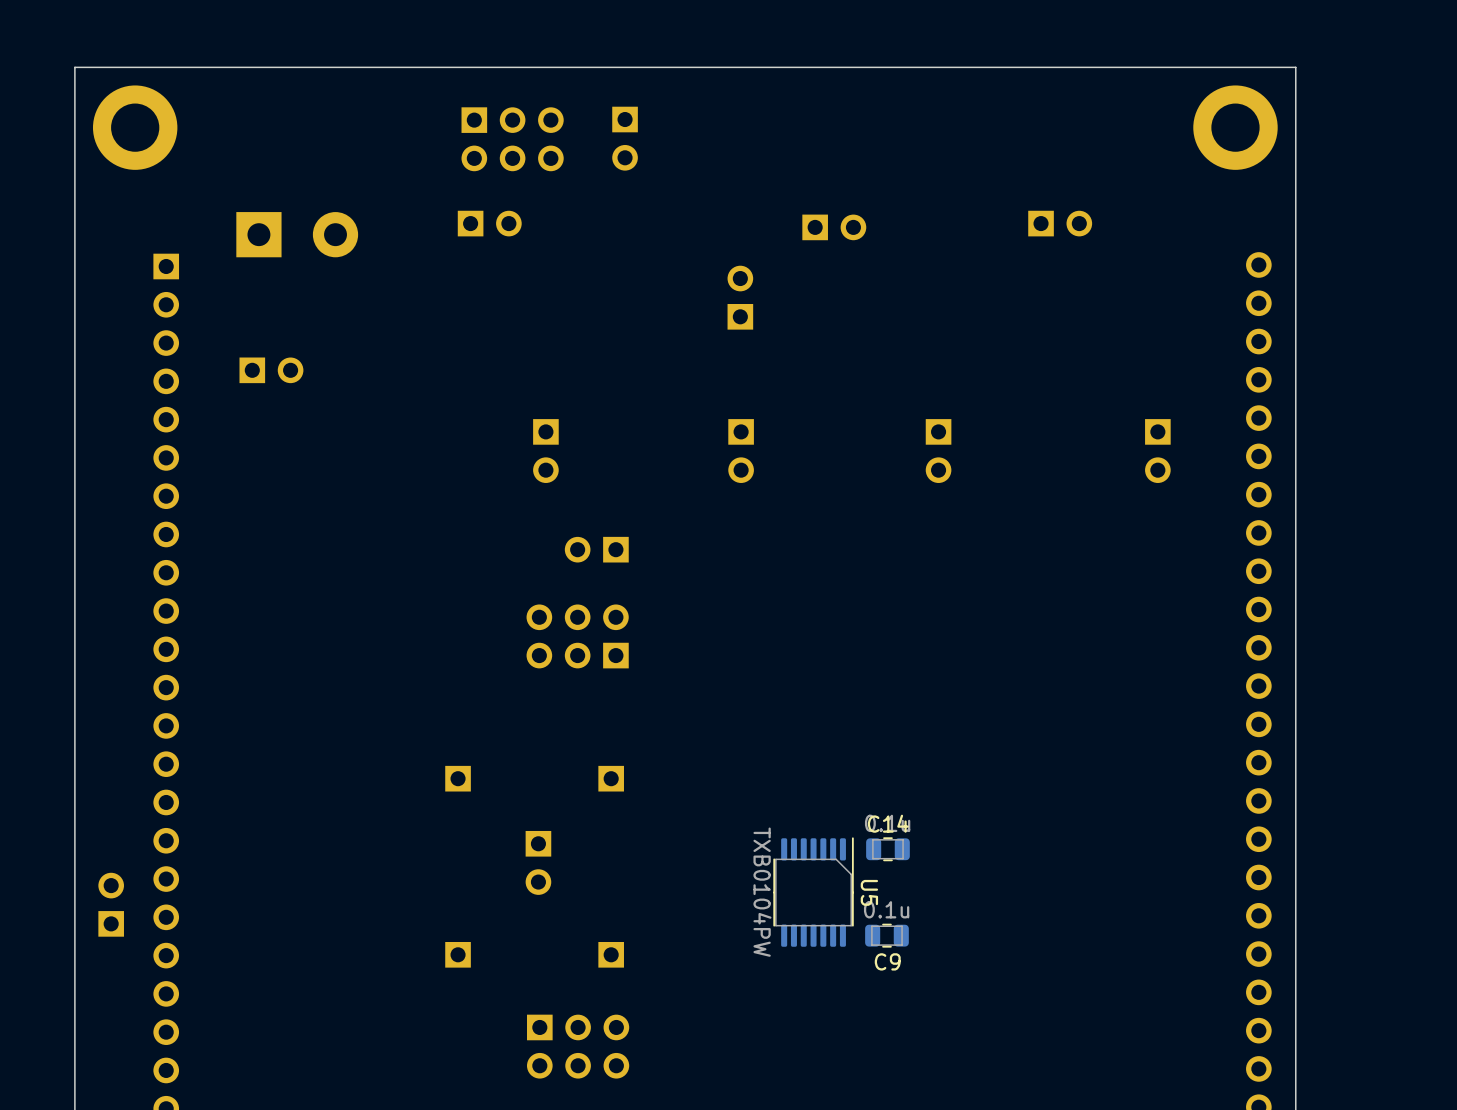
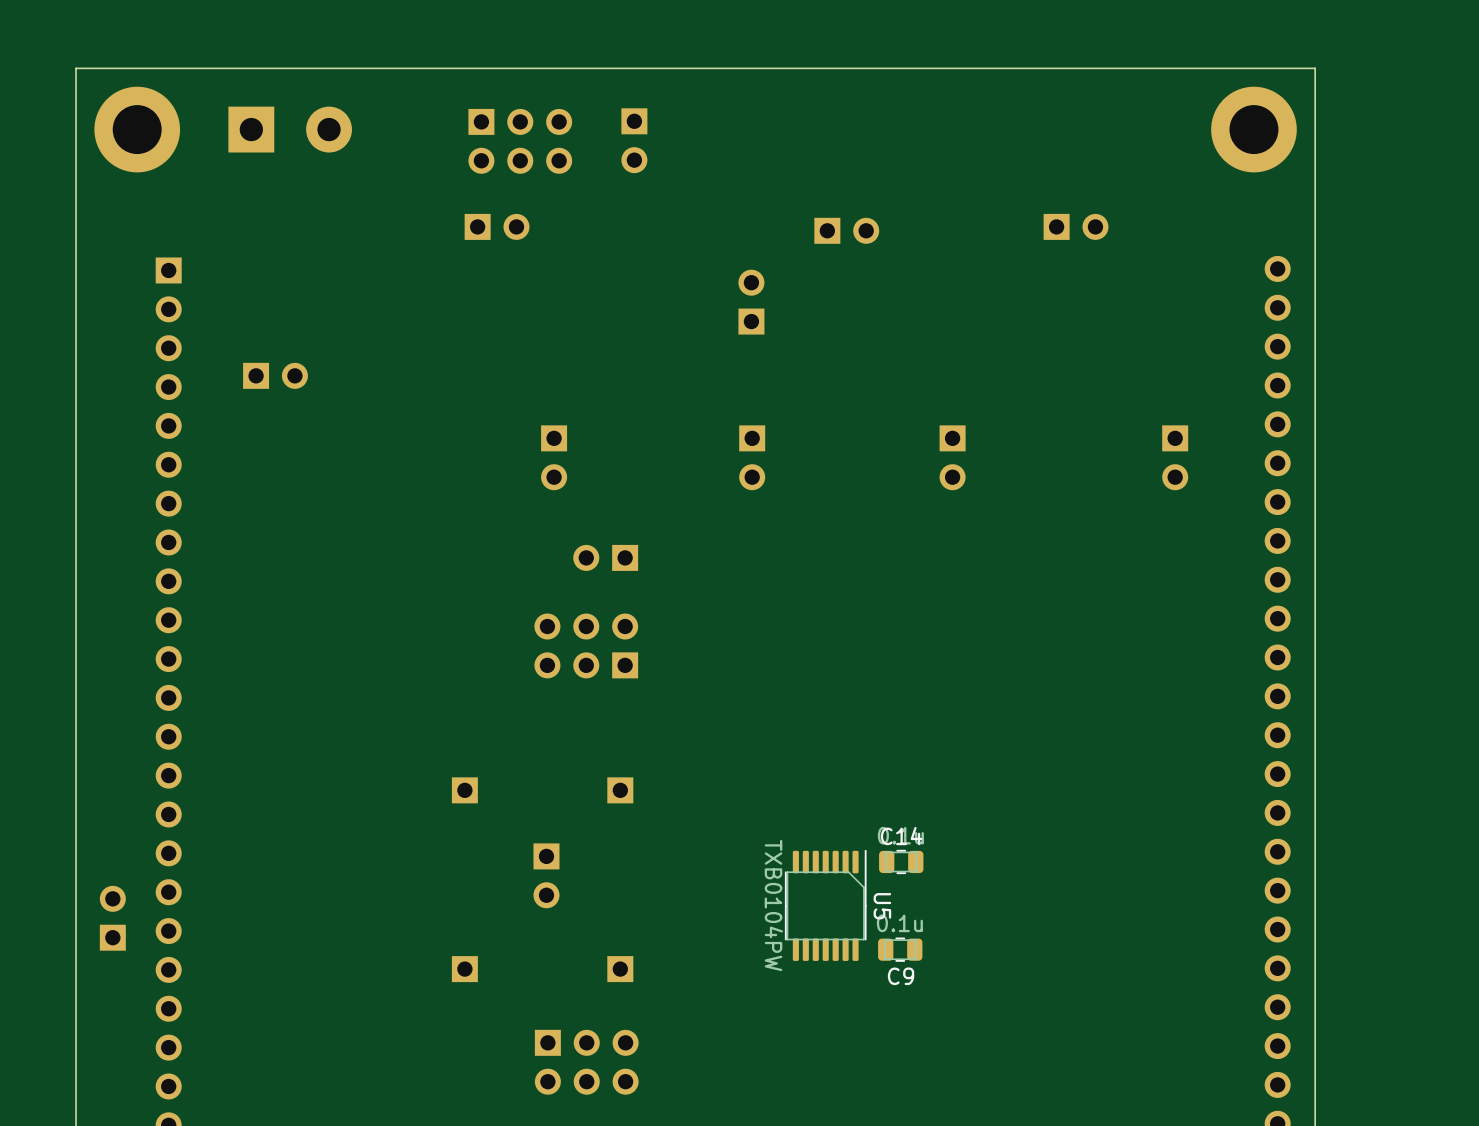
part position: (297, 234) -> (290, 129)

